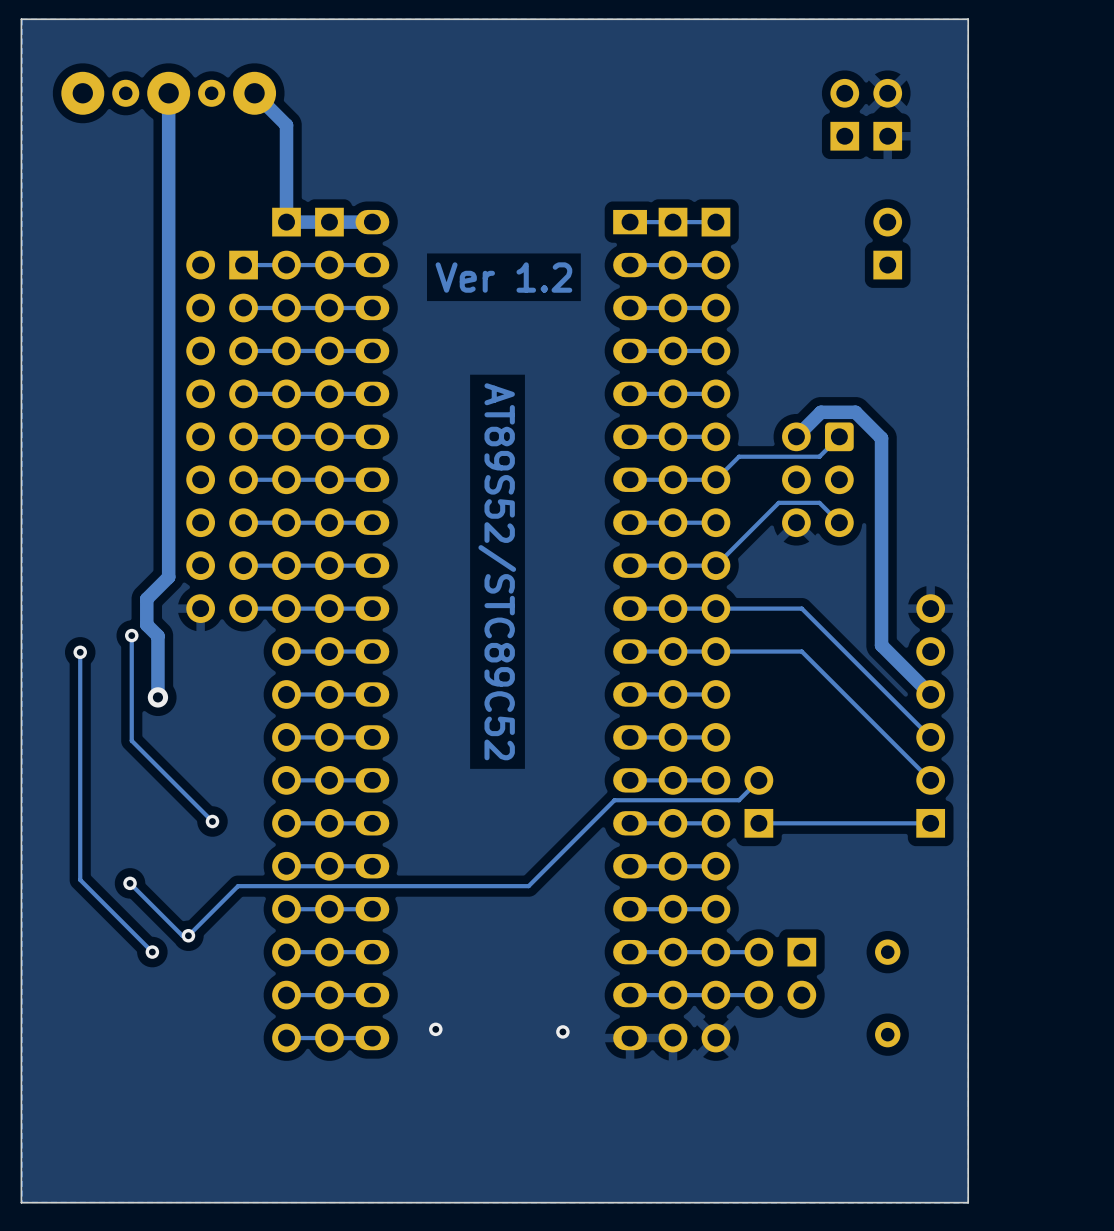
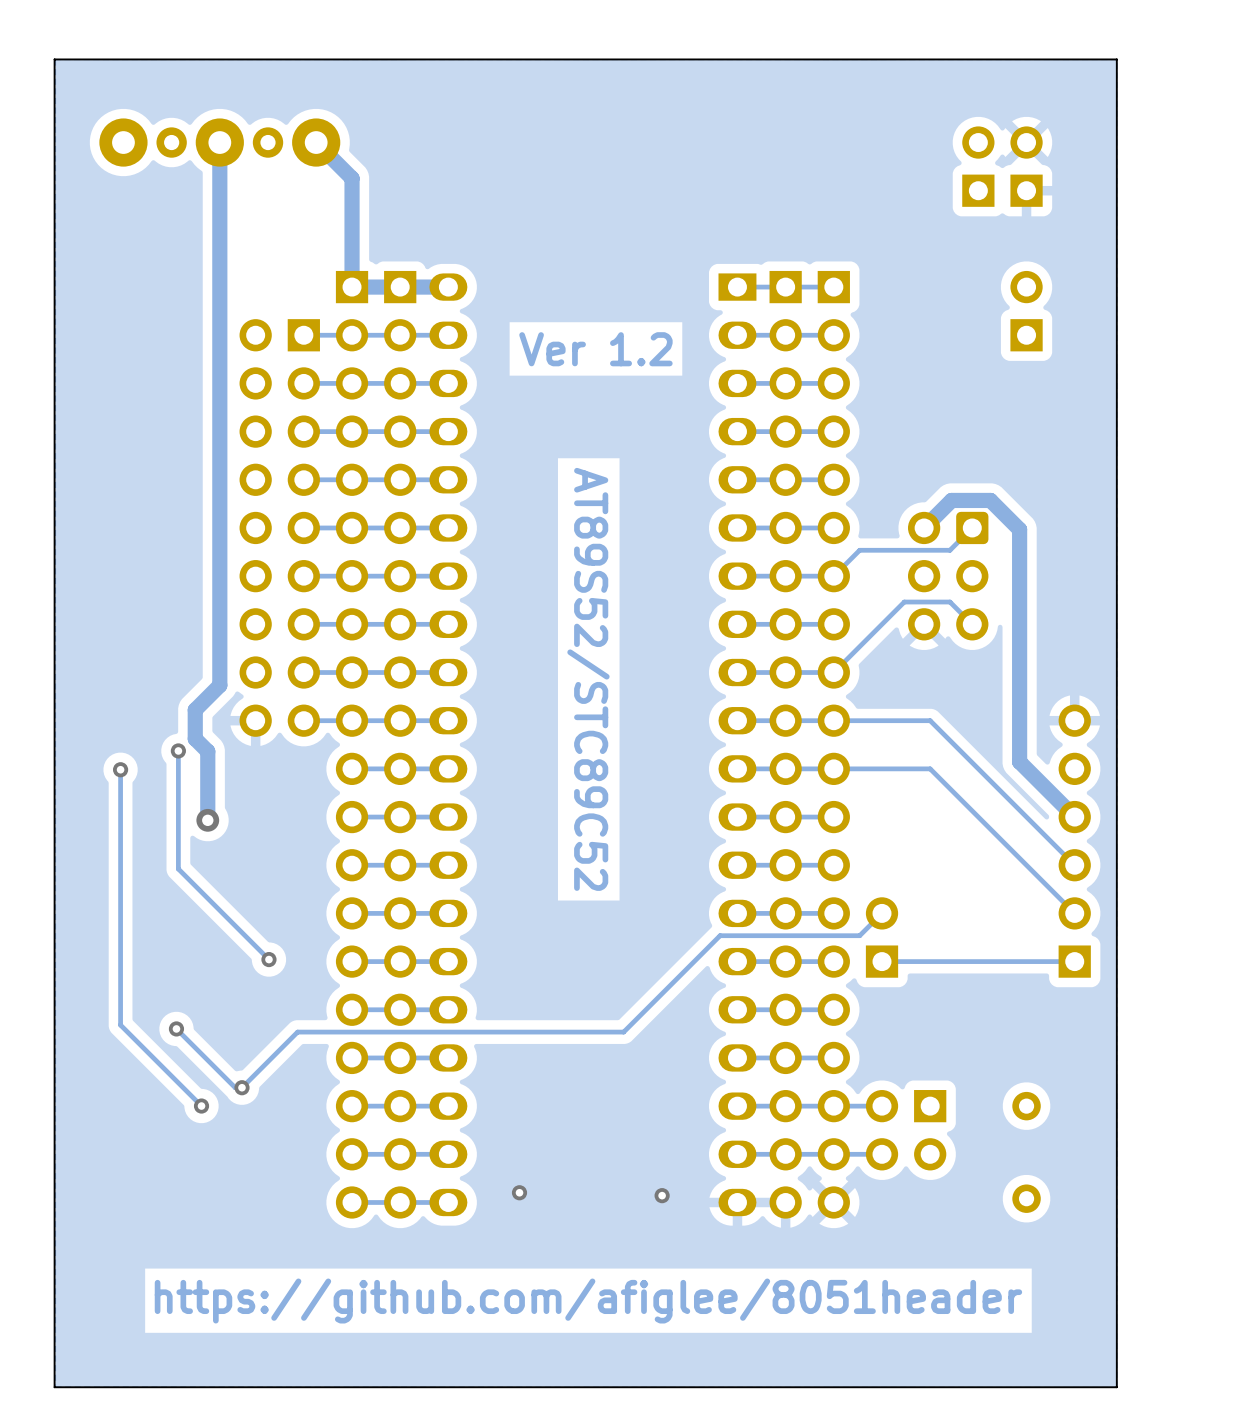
text: none -> https://github.com/afiglee/8051header (588, 1301)

